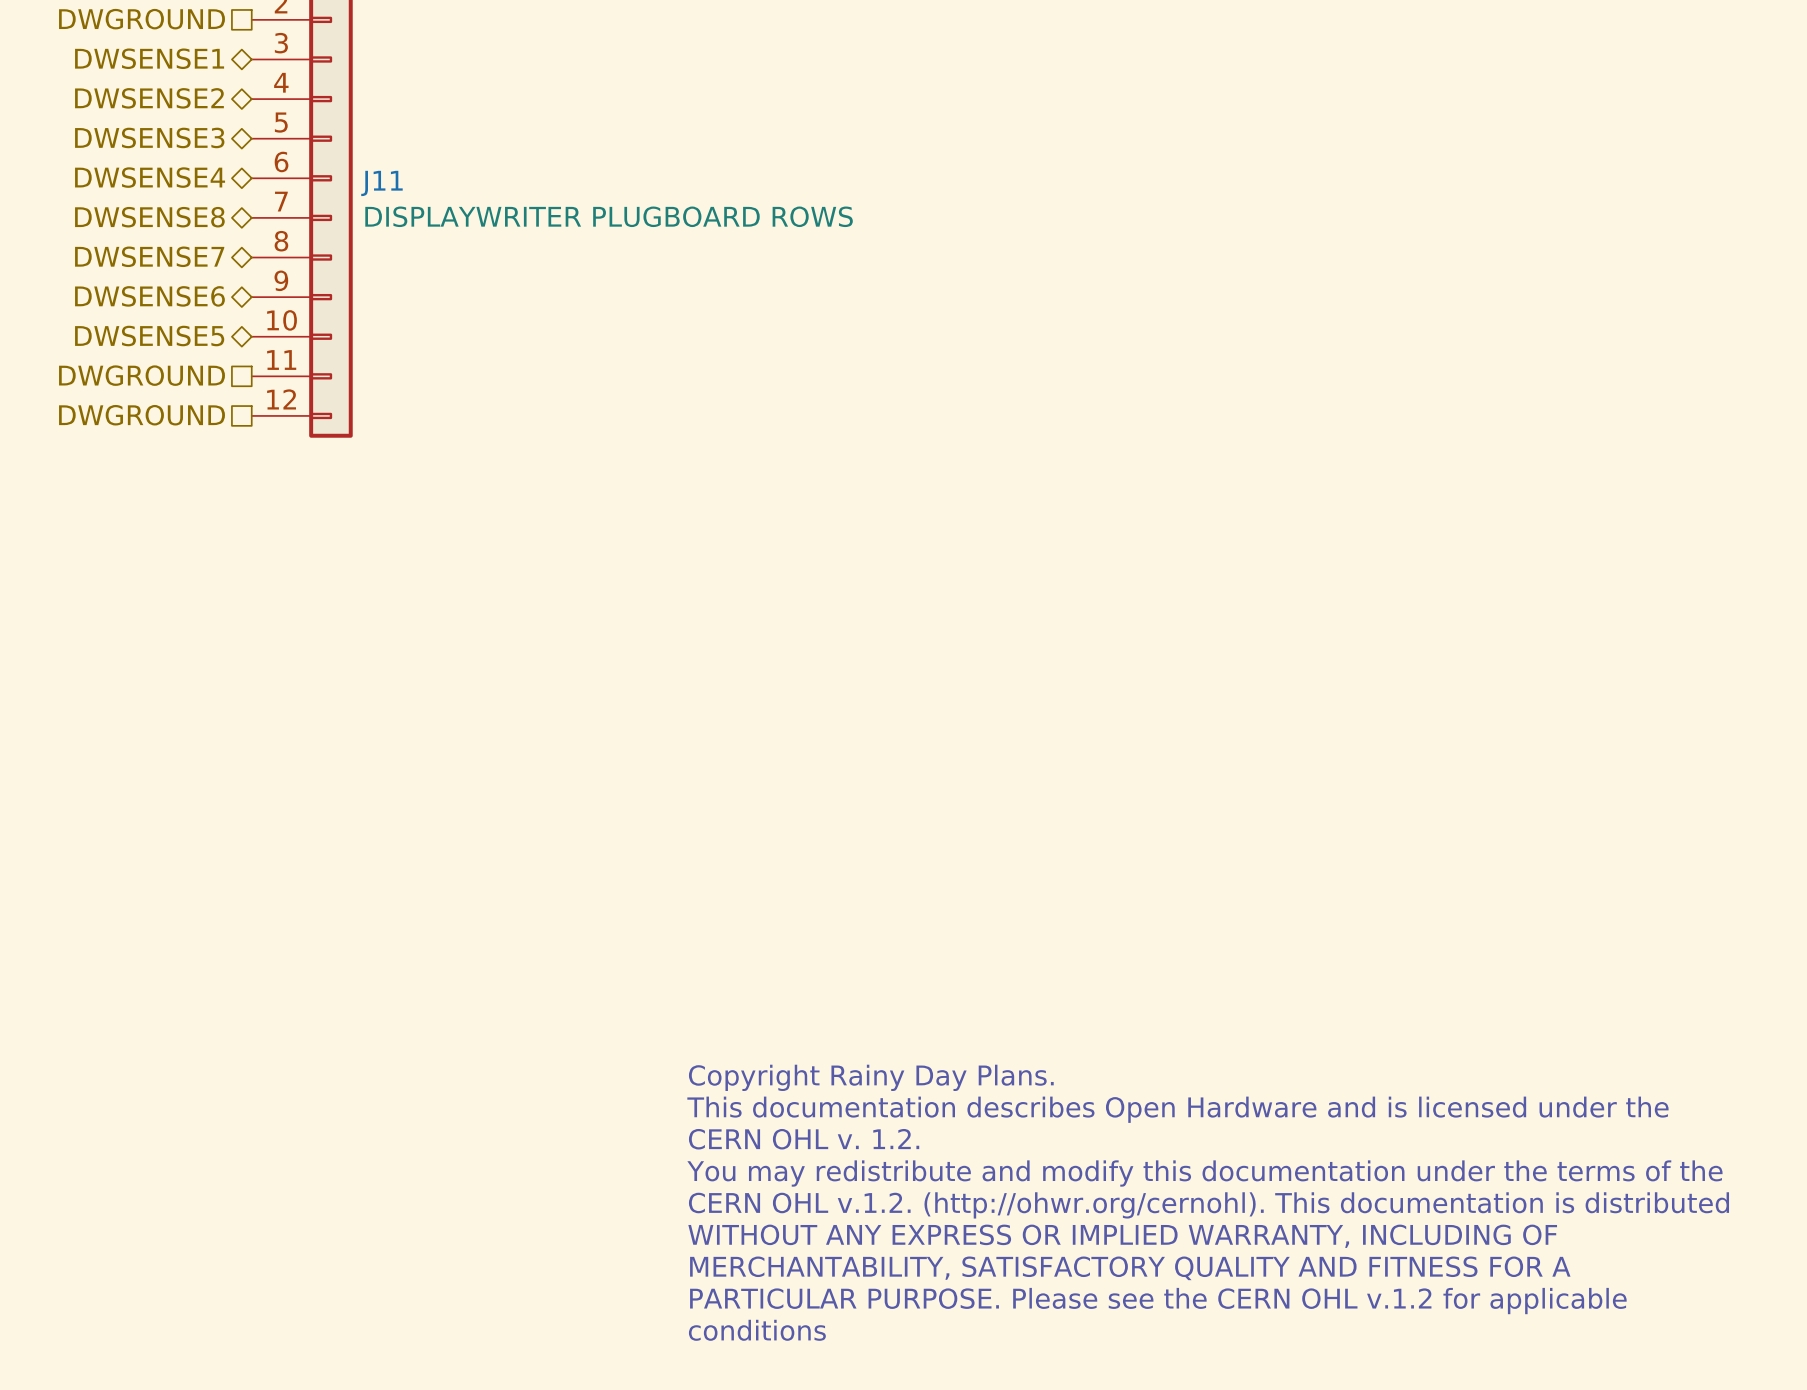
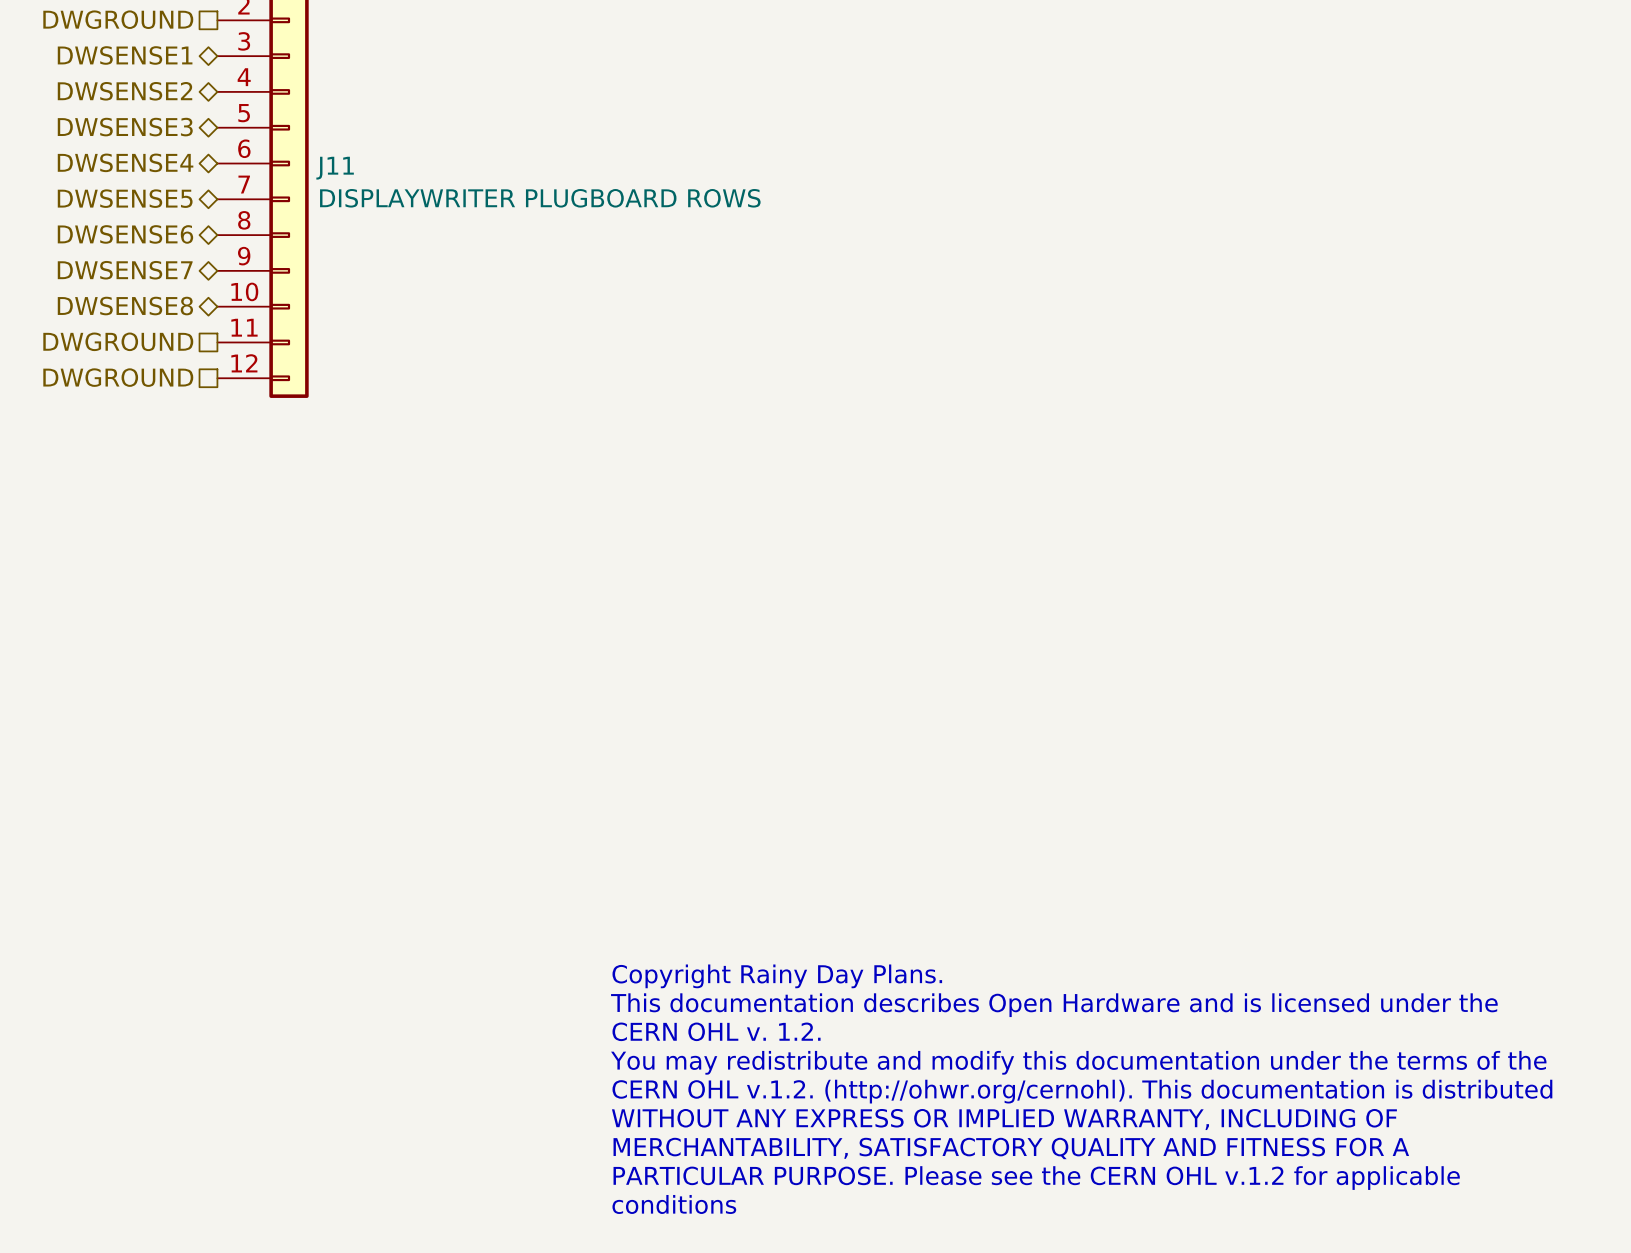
hierarchical label: DWSENSE8 (149, 217) -> DWSENSE5 (125, 198)
hierarchical label: DWSENSE7 (149, 256) -> DWSENSE6 (125, 234)
hierarchical label: DWSENSE6 (149, 296) -> DWSENSE7 (125, 270)
hierarchical label: DWSENSE5 (149, 336) -> DWSENSE8 (125, 306)

